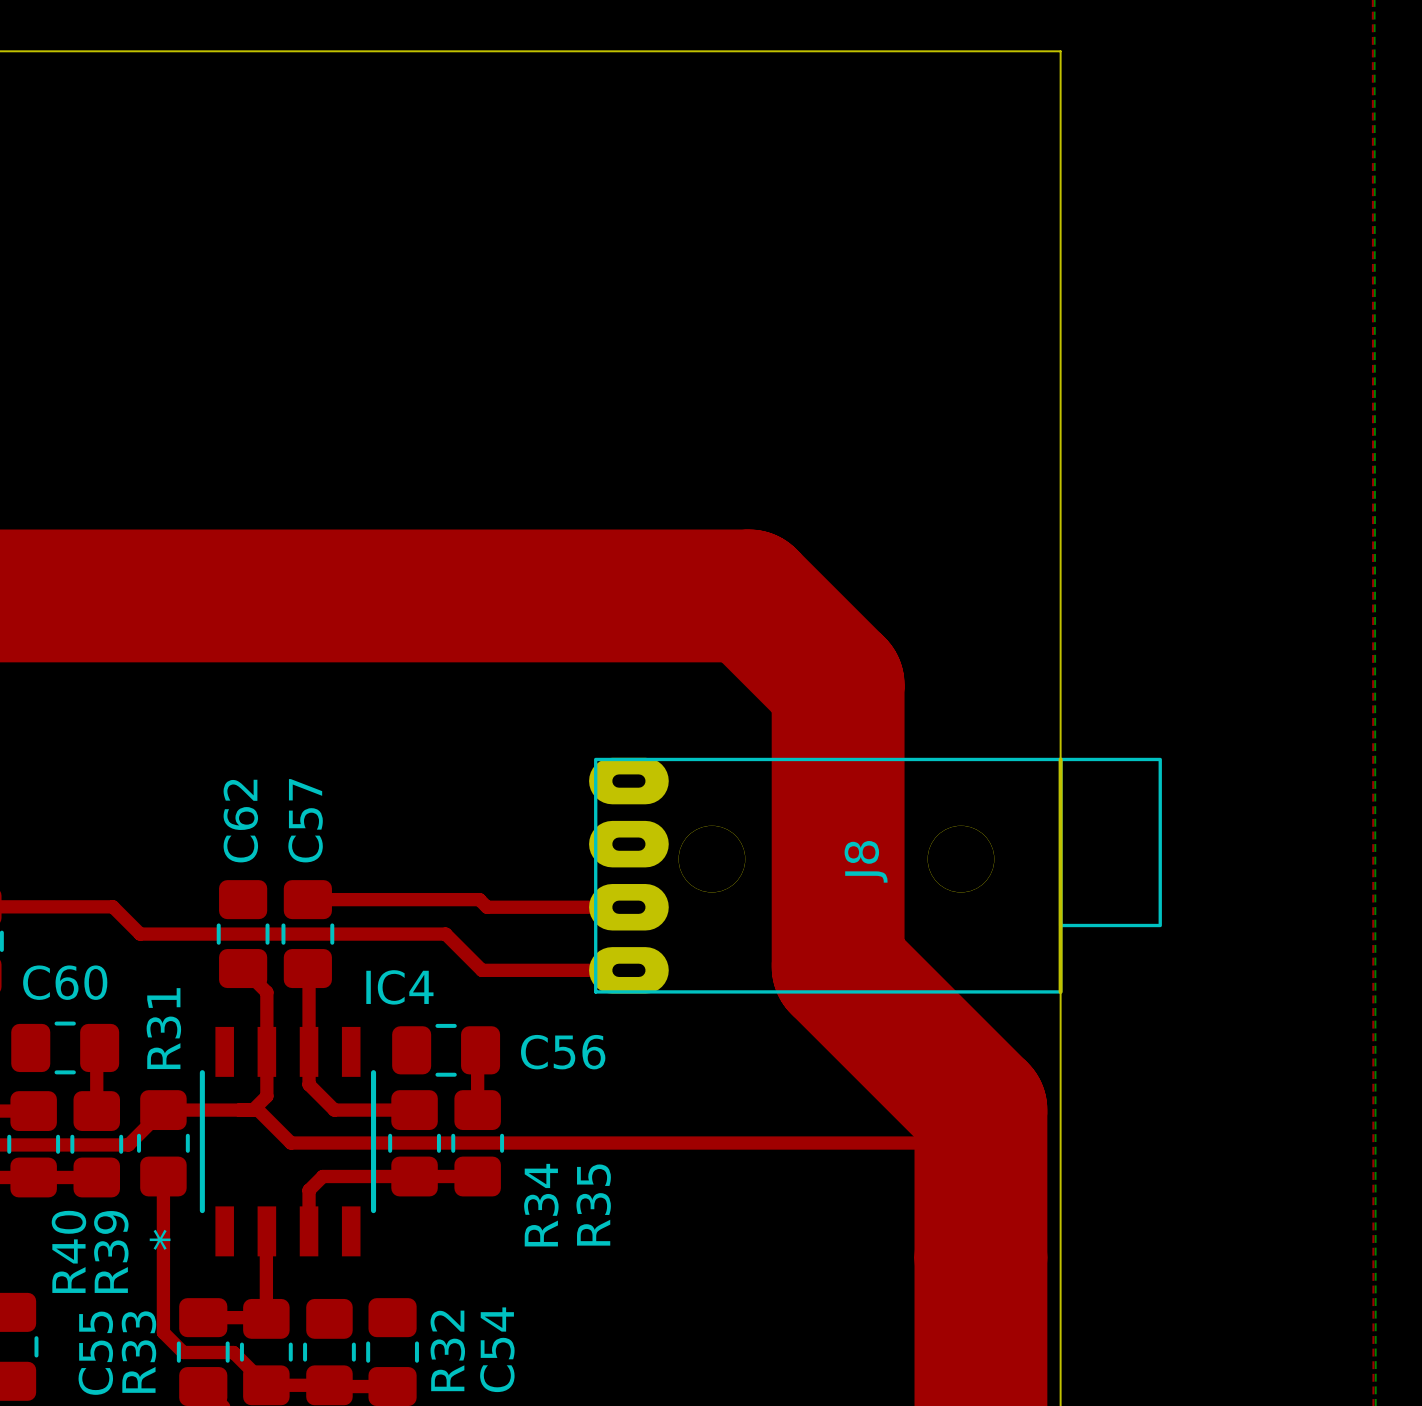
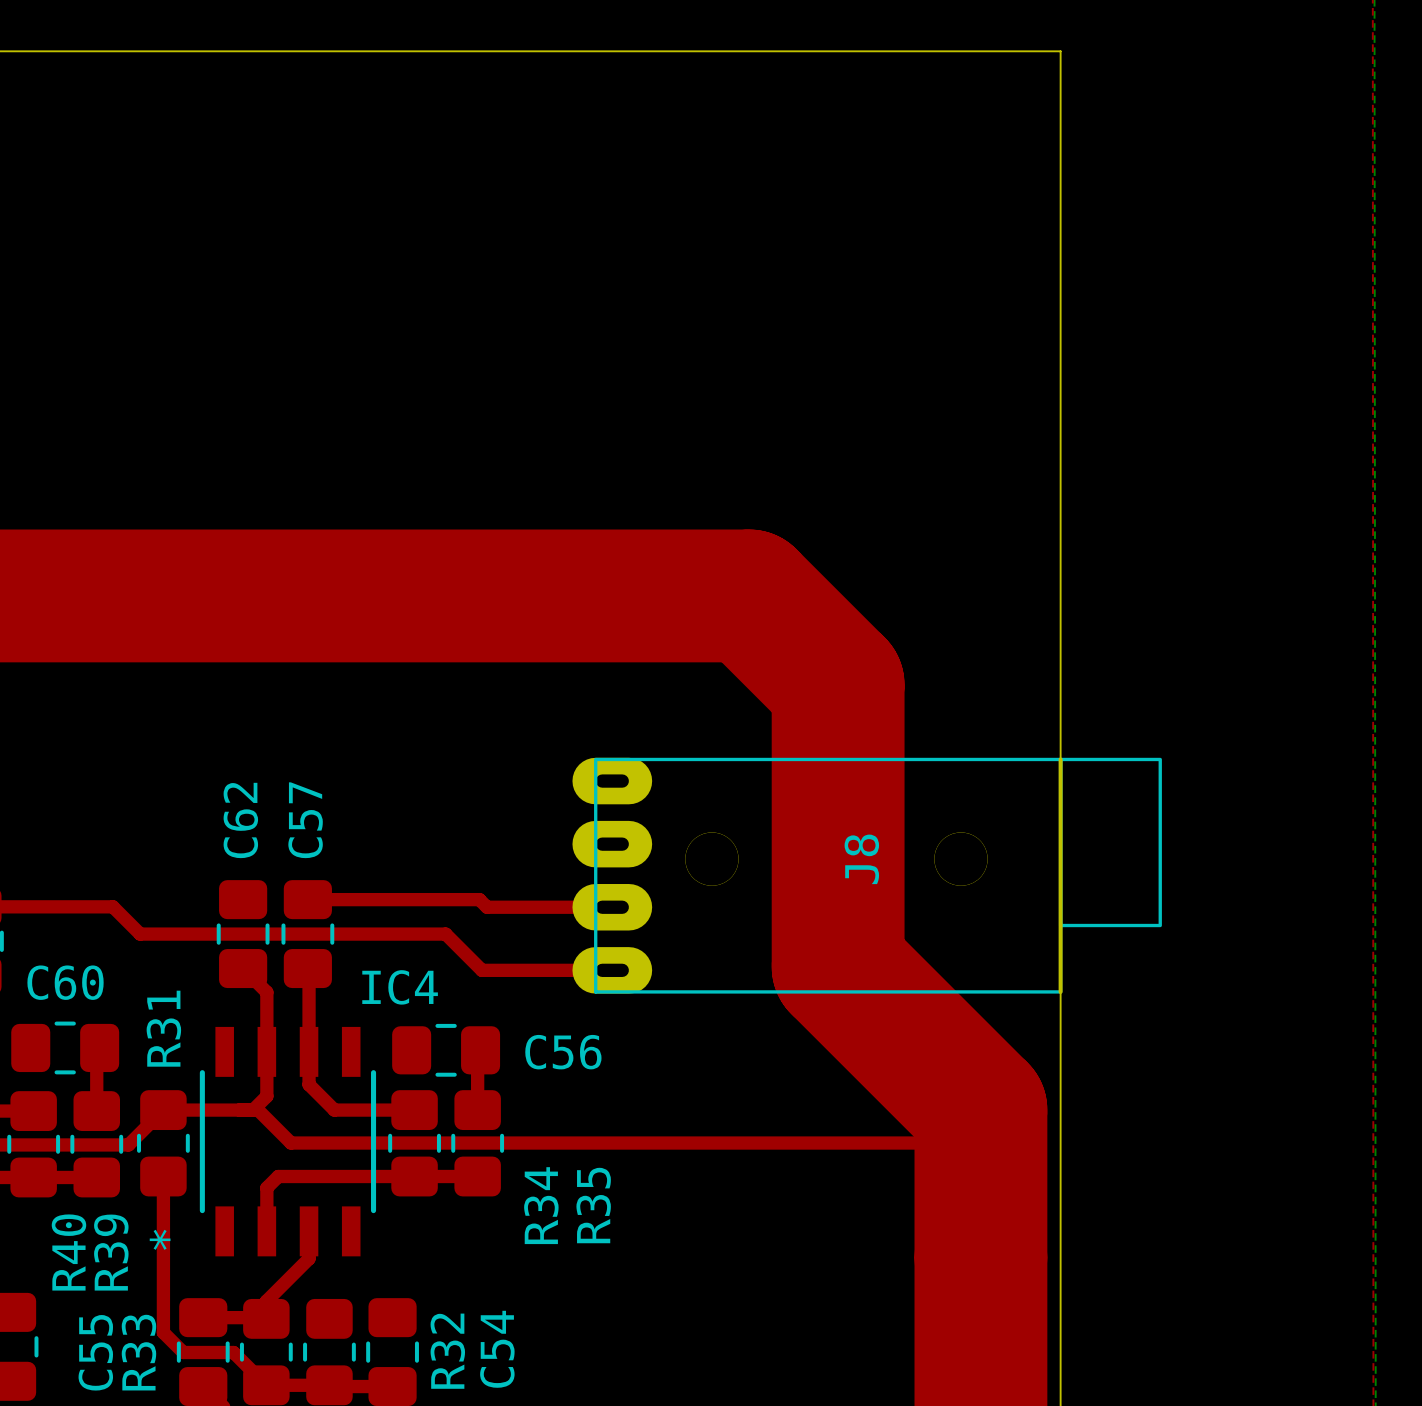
J8 footprint: [589, 757, 1162, 994] -> [572, 757, 1162, 994]
top track: (322, 1176) (309, 1190) (309, 1231) -> (322, 1176) (278, 1176) (266, 1187) (266, 1231)
top track: (266, 1231) (266, 1301) -> (309, 1231) (309, 1258) (266, 1301)

